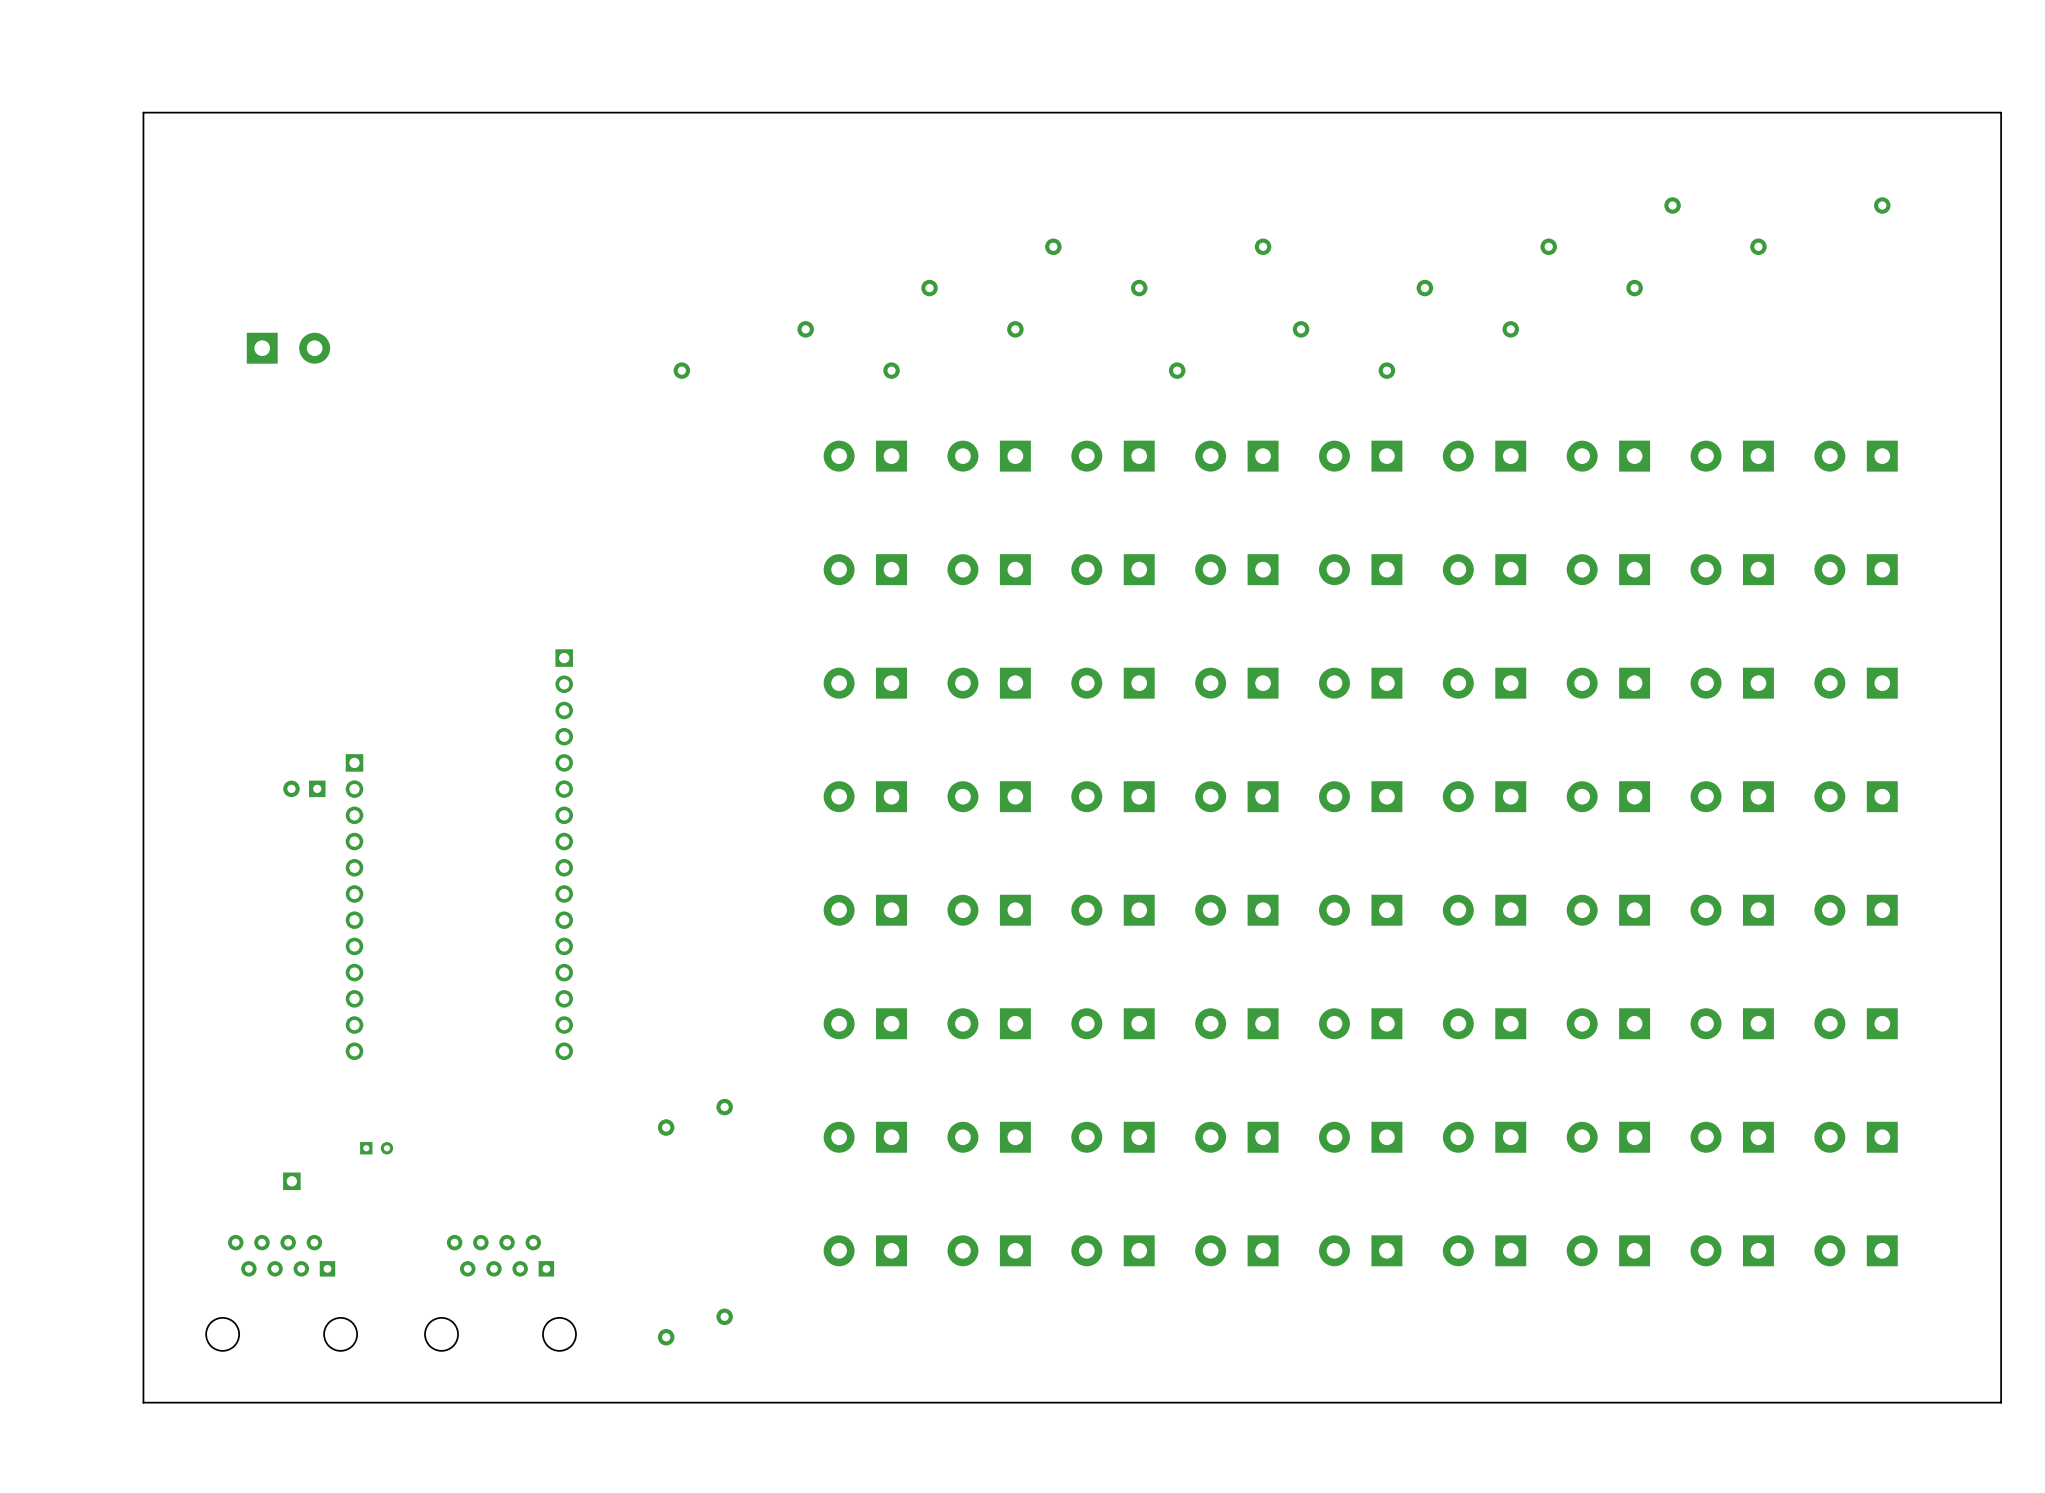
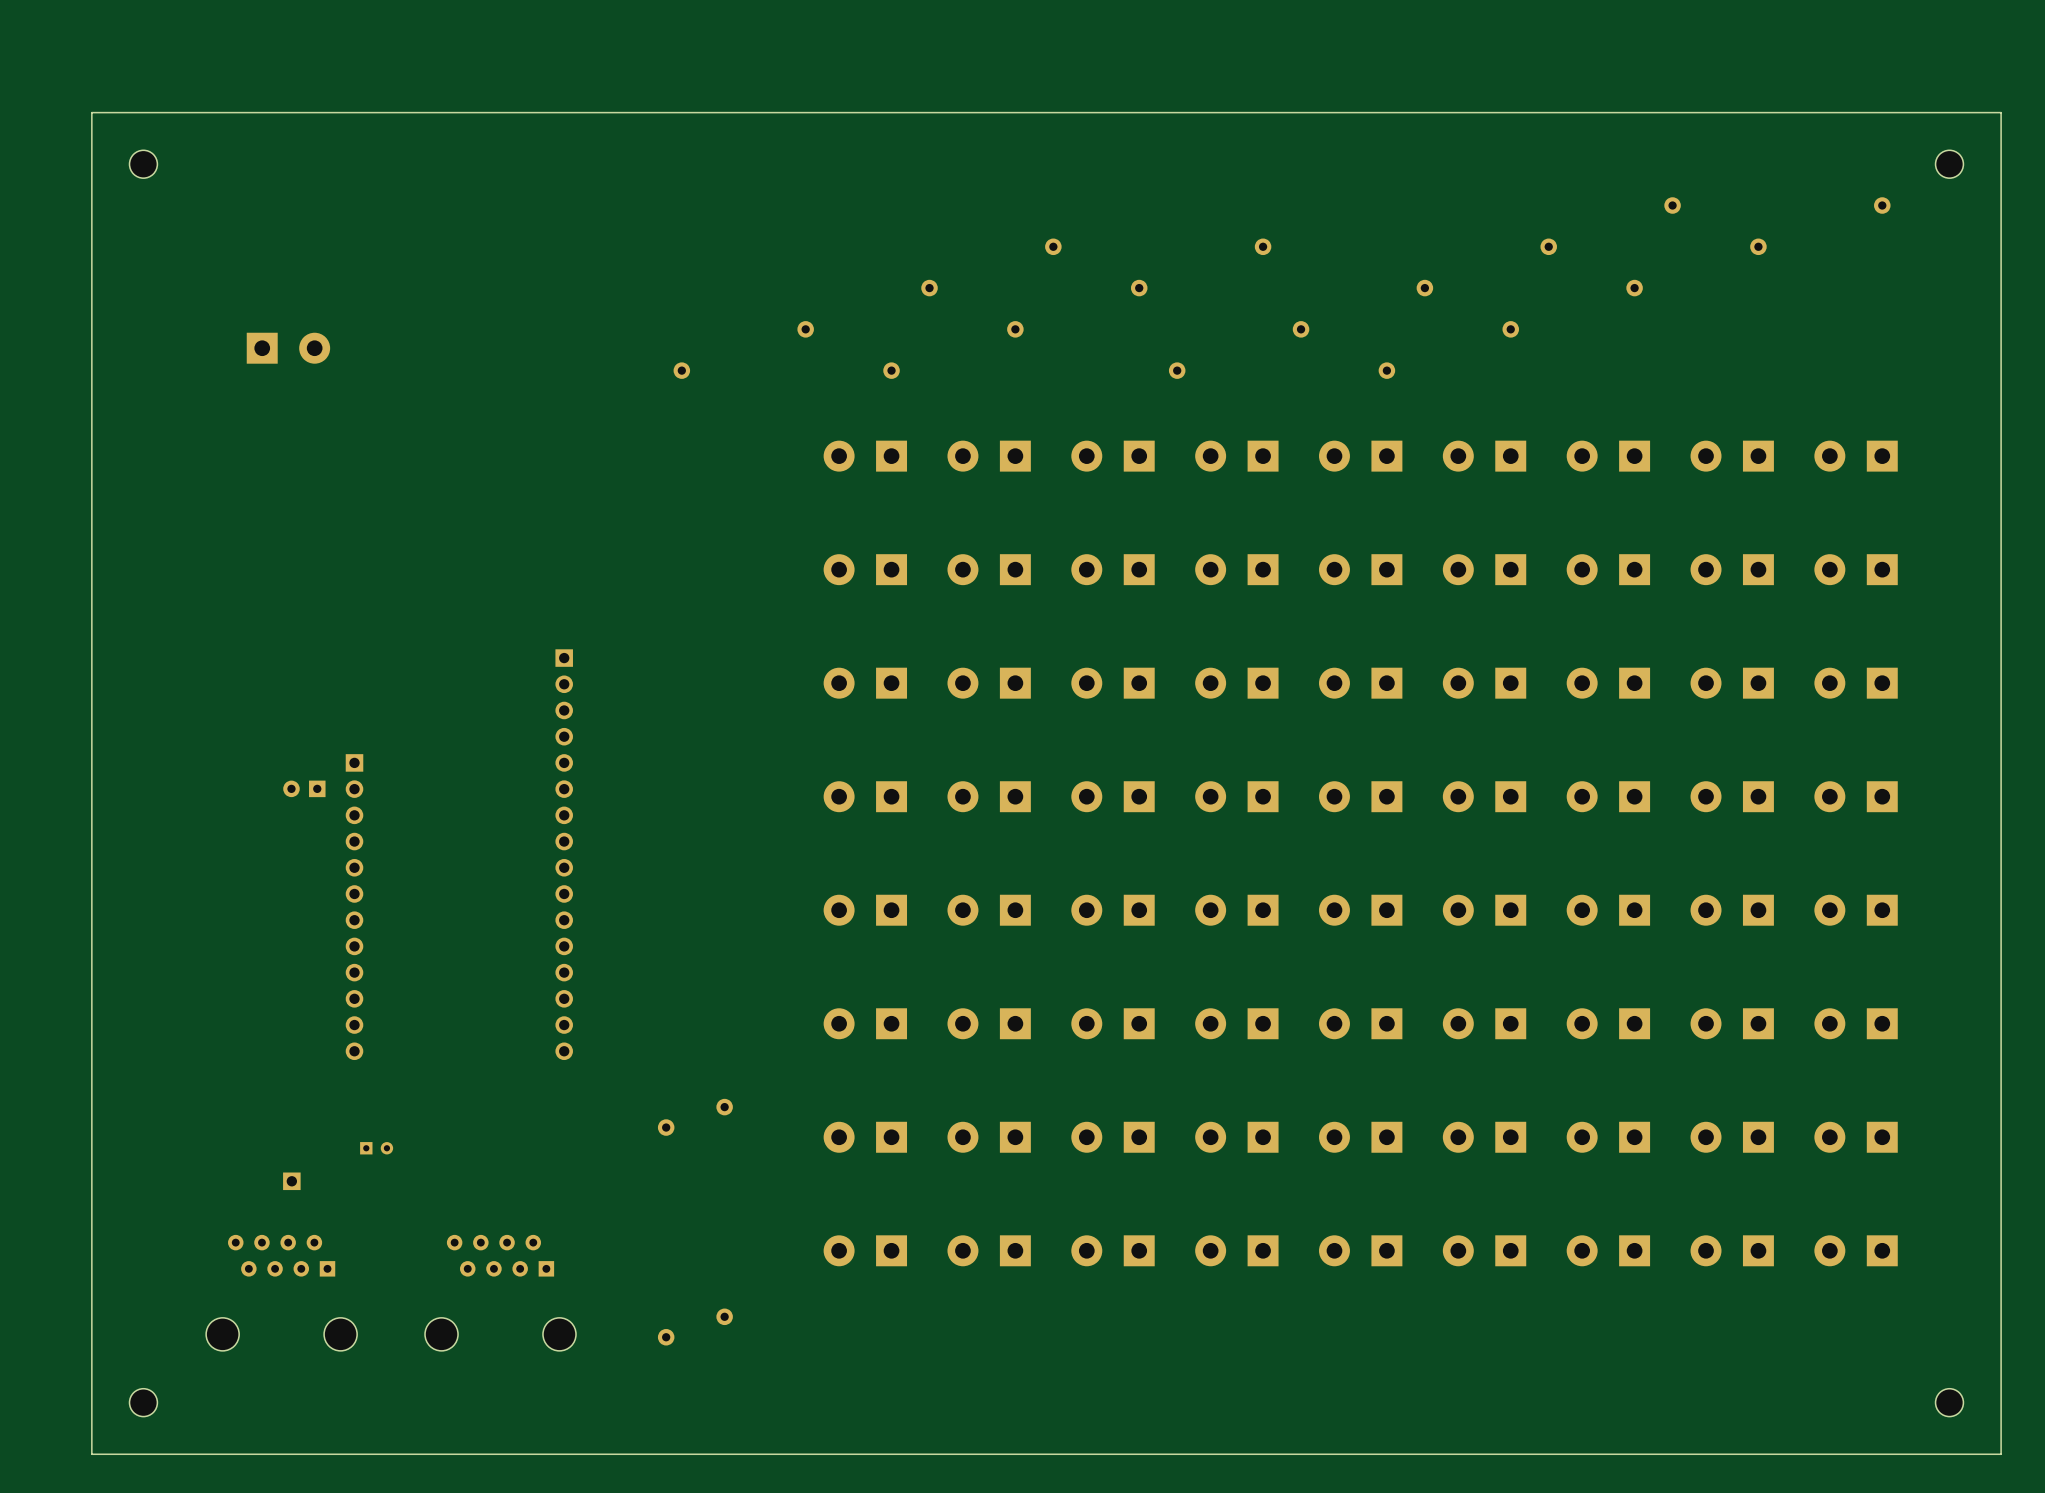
board edge: (143, 112) (143, 1402) (2001, 1402) -> (143, 112) (91, 112) (91, 1454) (2001, 1454) (2001, 1402)
part: none -> (143, 164)
part: none -> (1949, 164)
part: none -> (143, 1402)
part: none -> (1949, 1402)

